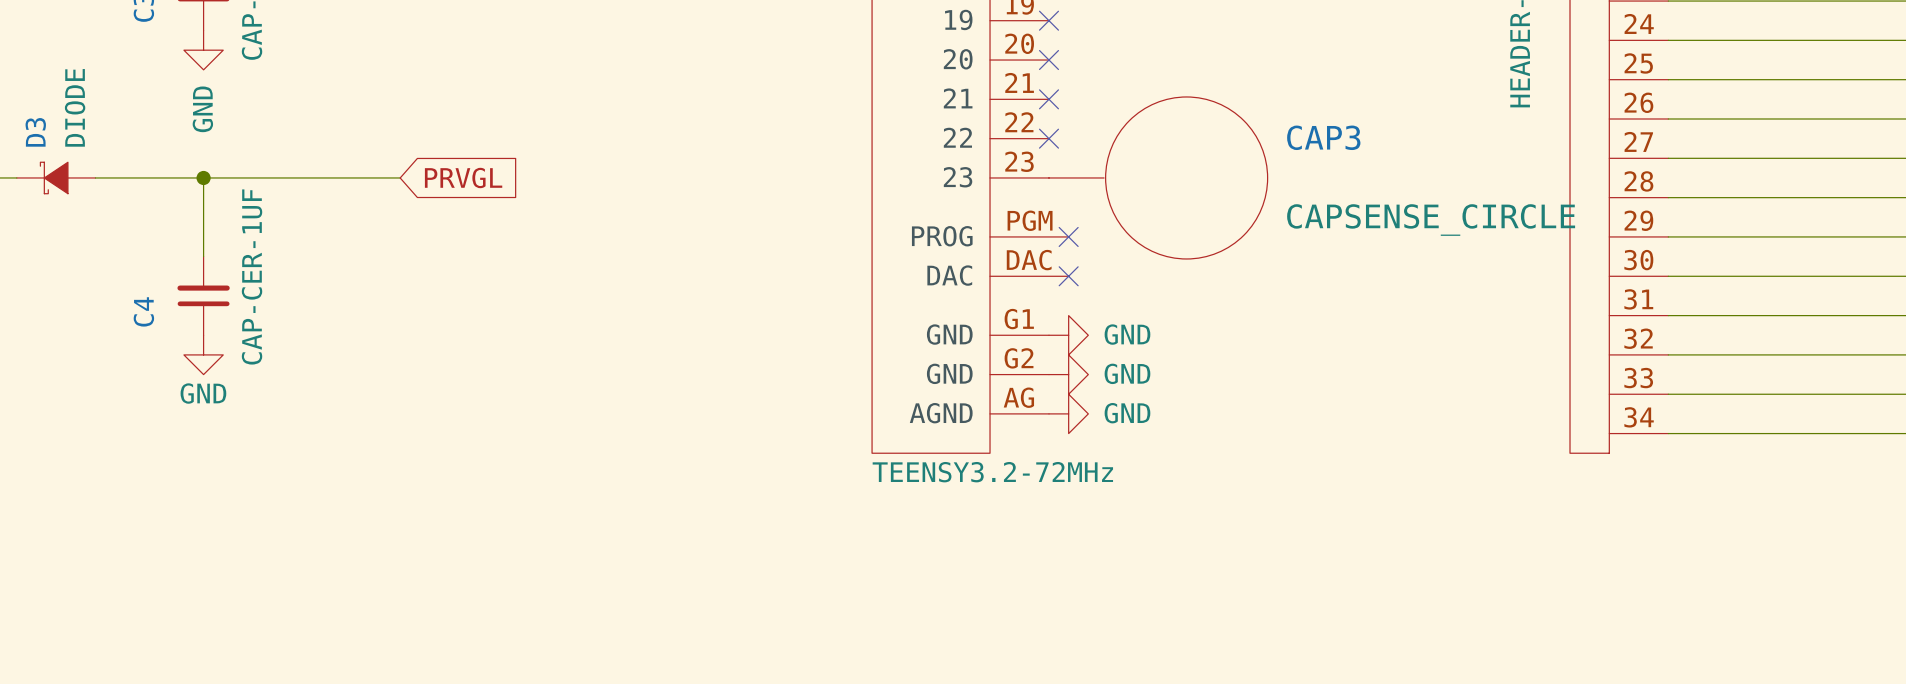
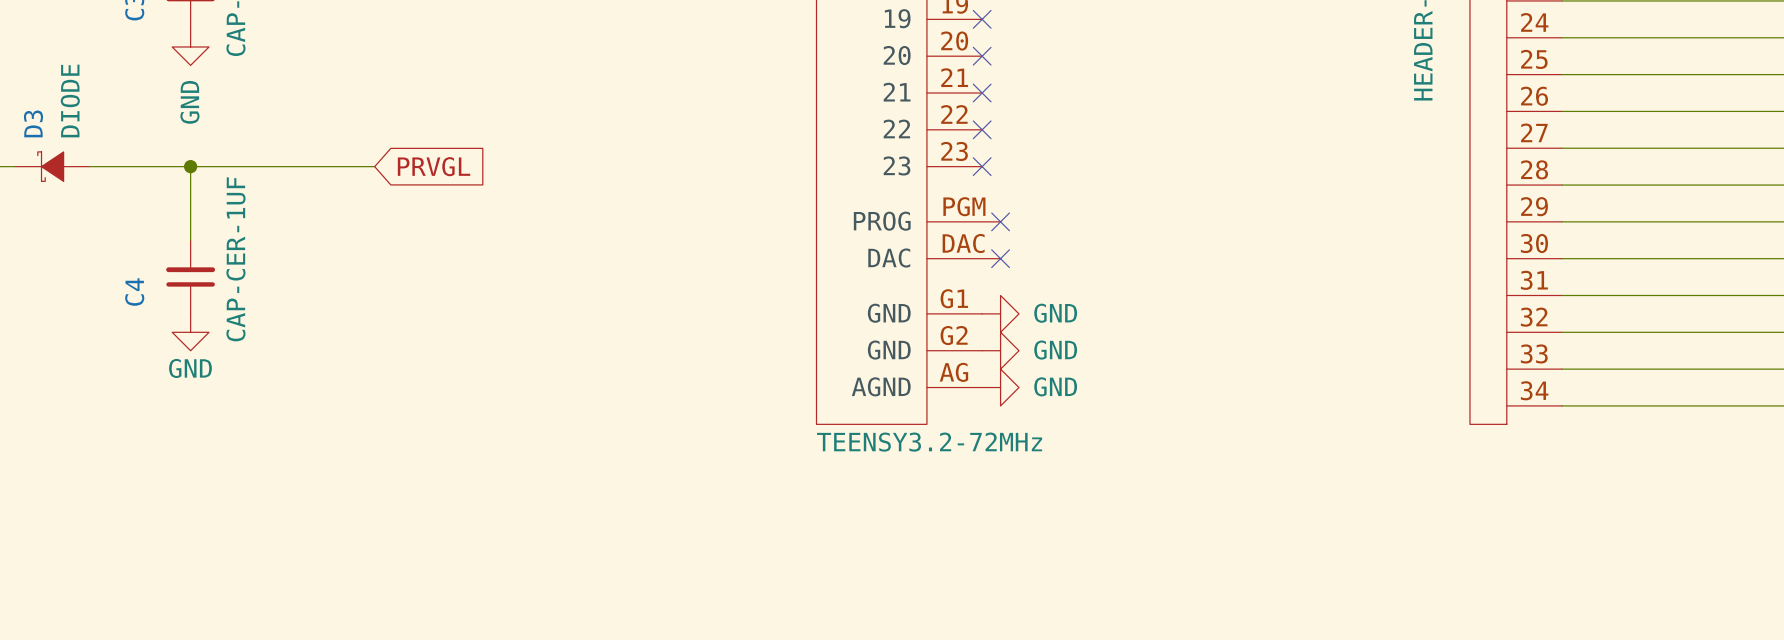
no-connect mark: none -> (982, 166)
CAP3: CAPSENSE_CIRCLE (1158, 177) -> none

